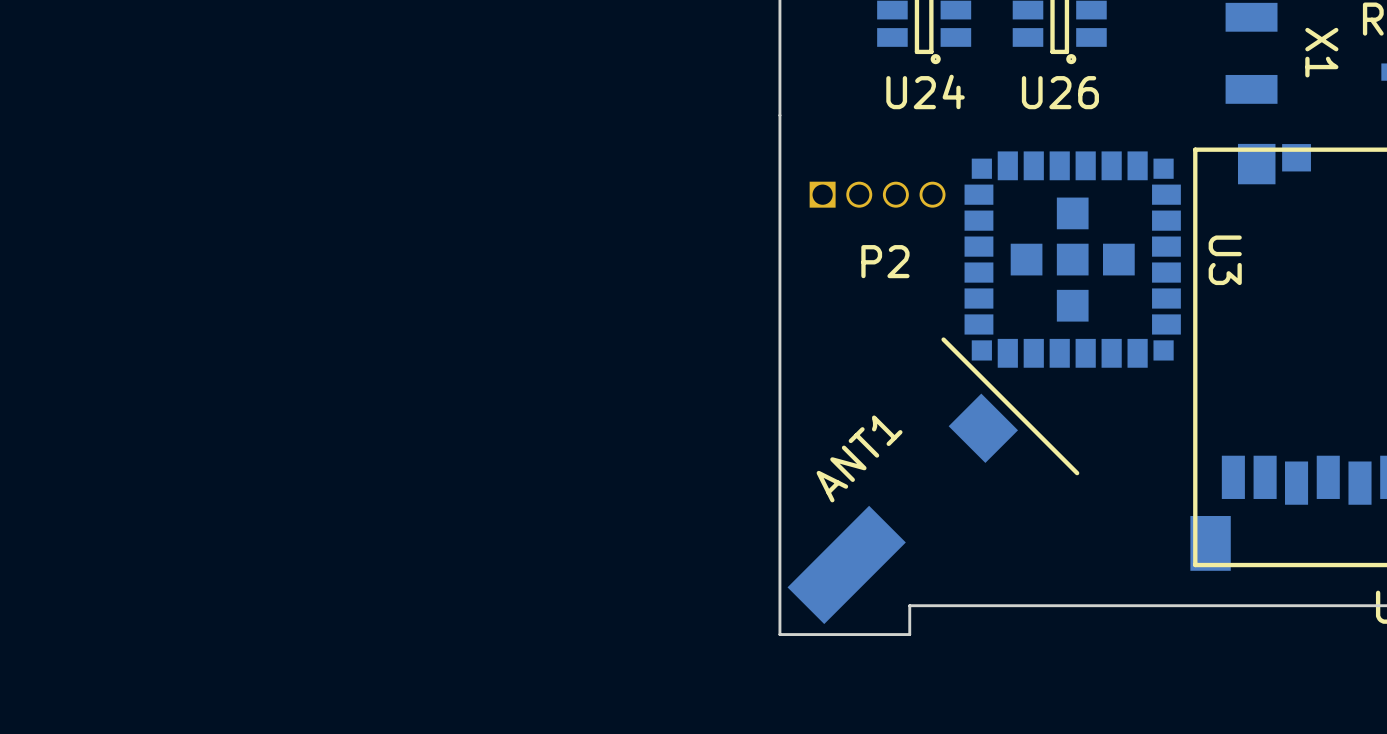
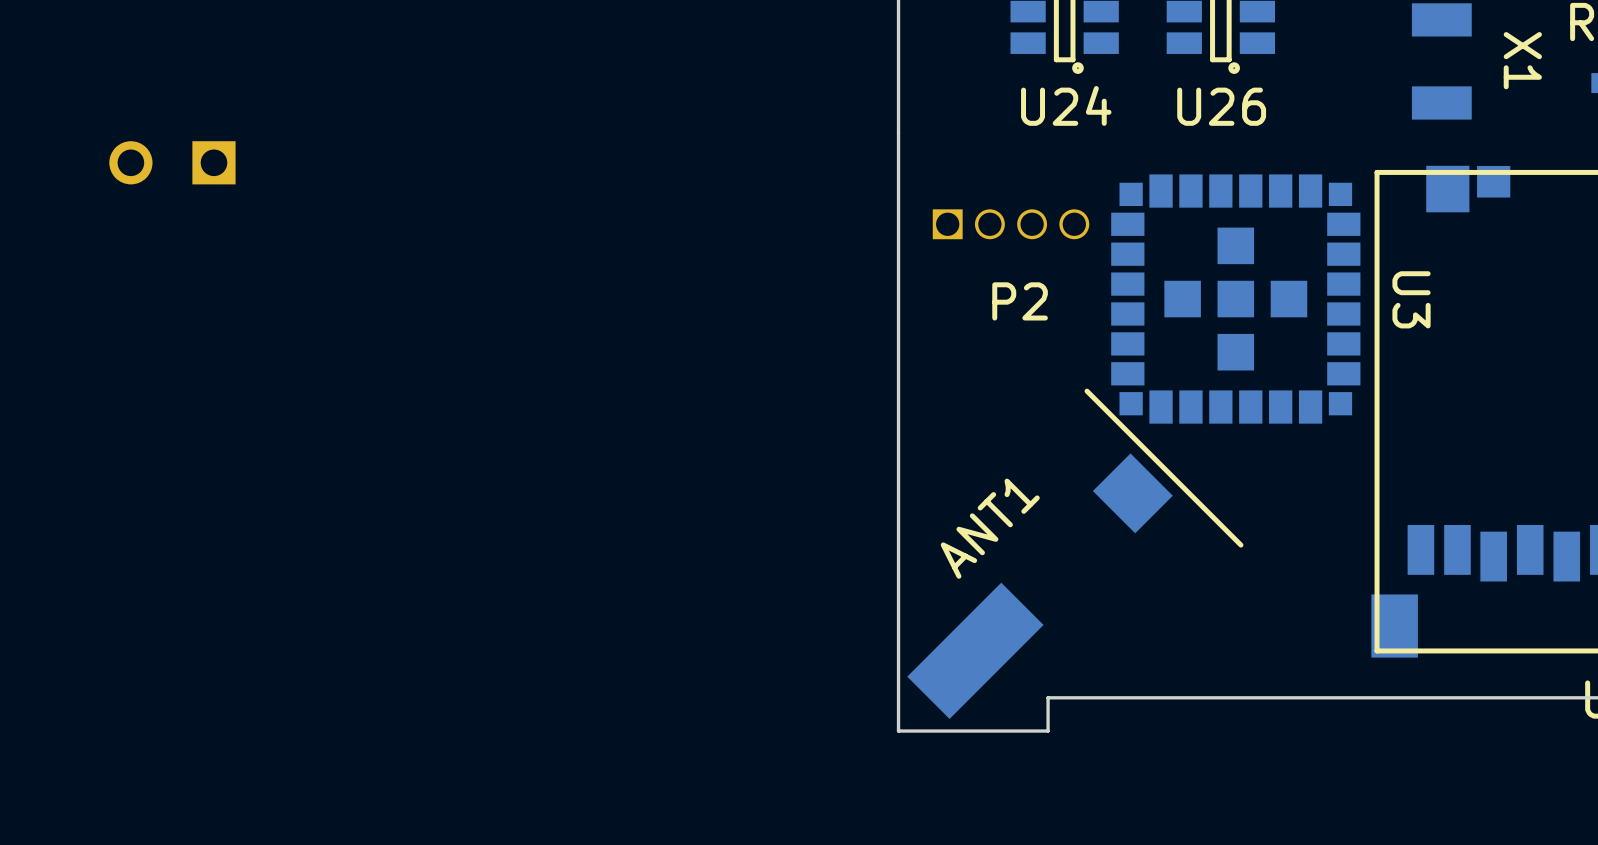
part: none -> (172, 162)

